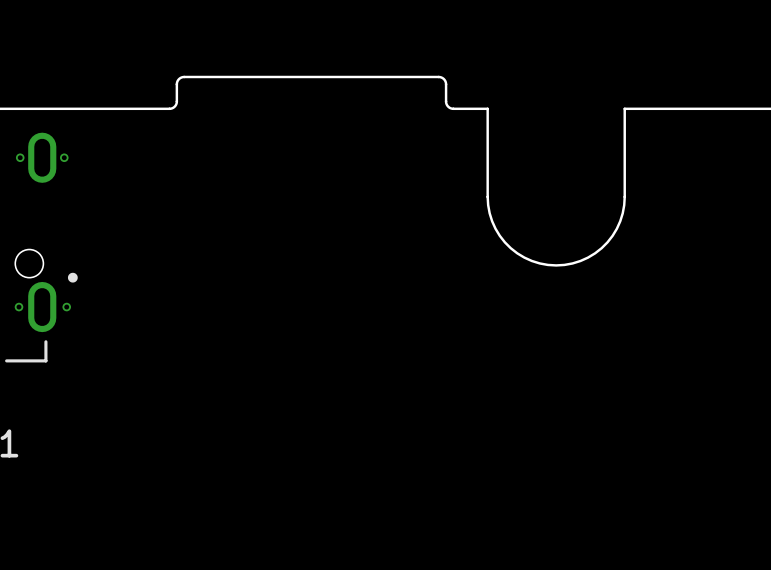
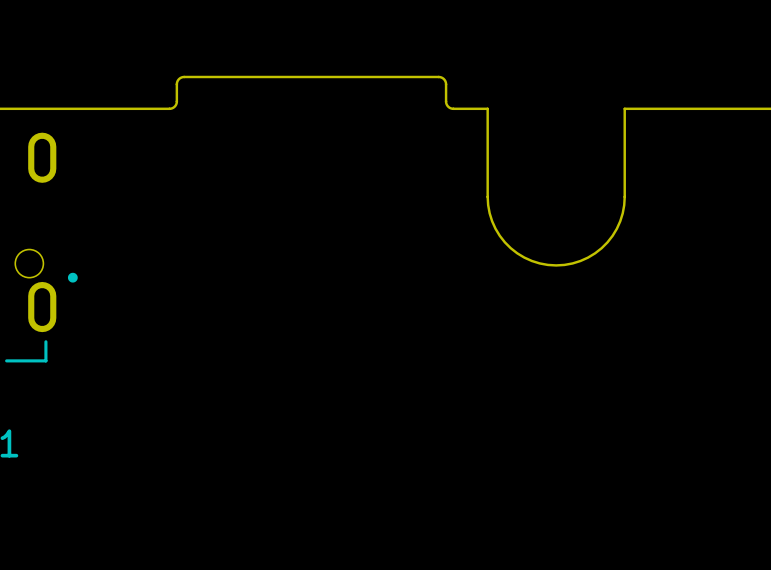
via: (20, 157) -> none
via: (64, 157) -> none
via: (19, 307) -> none
via: (66, 307) -> none

